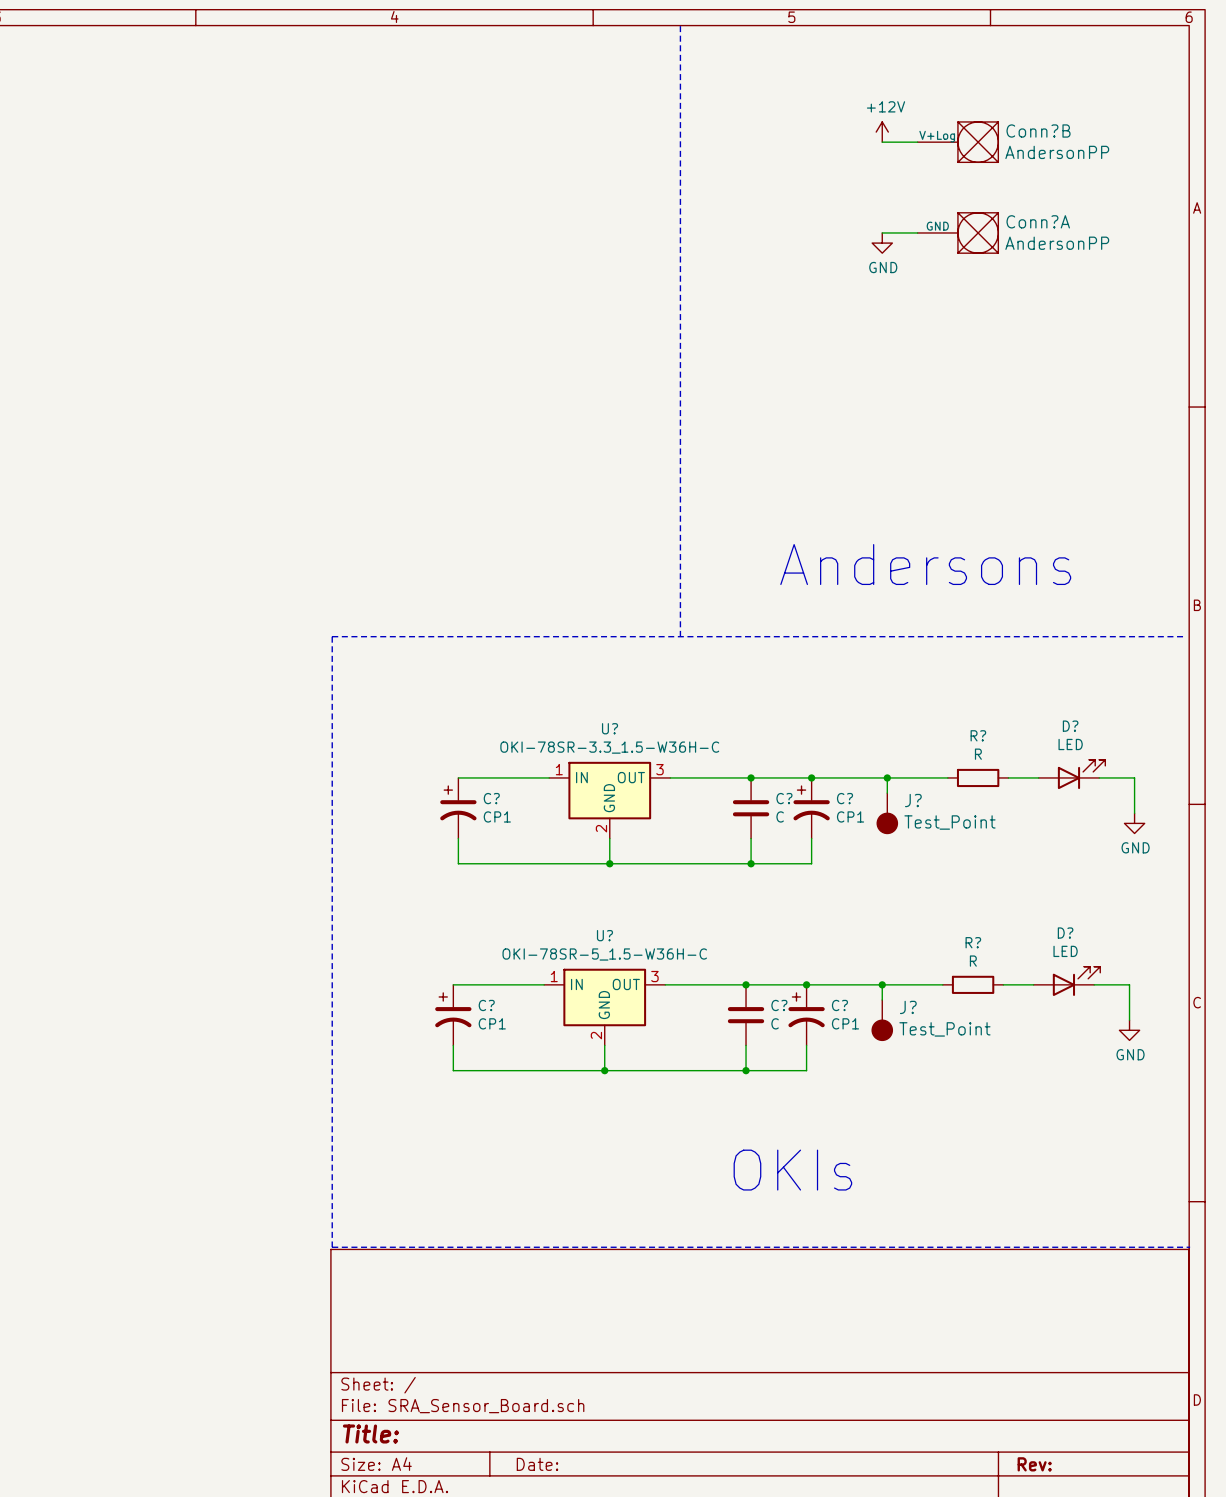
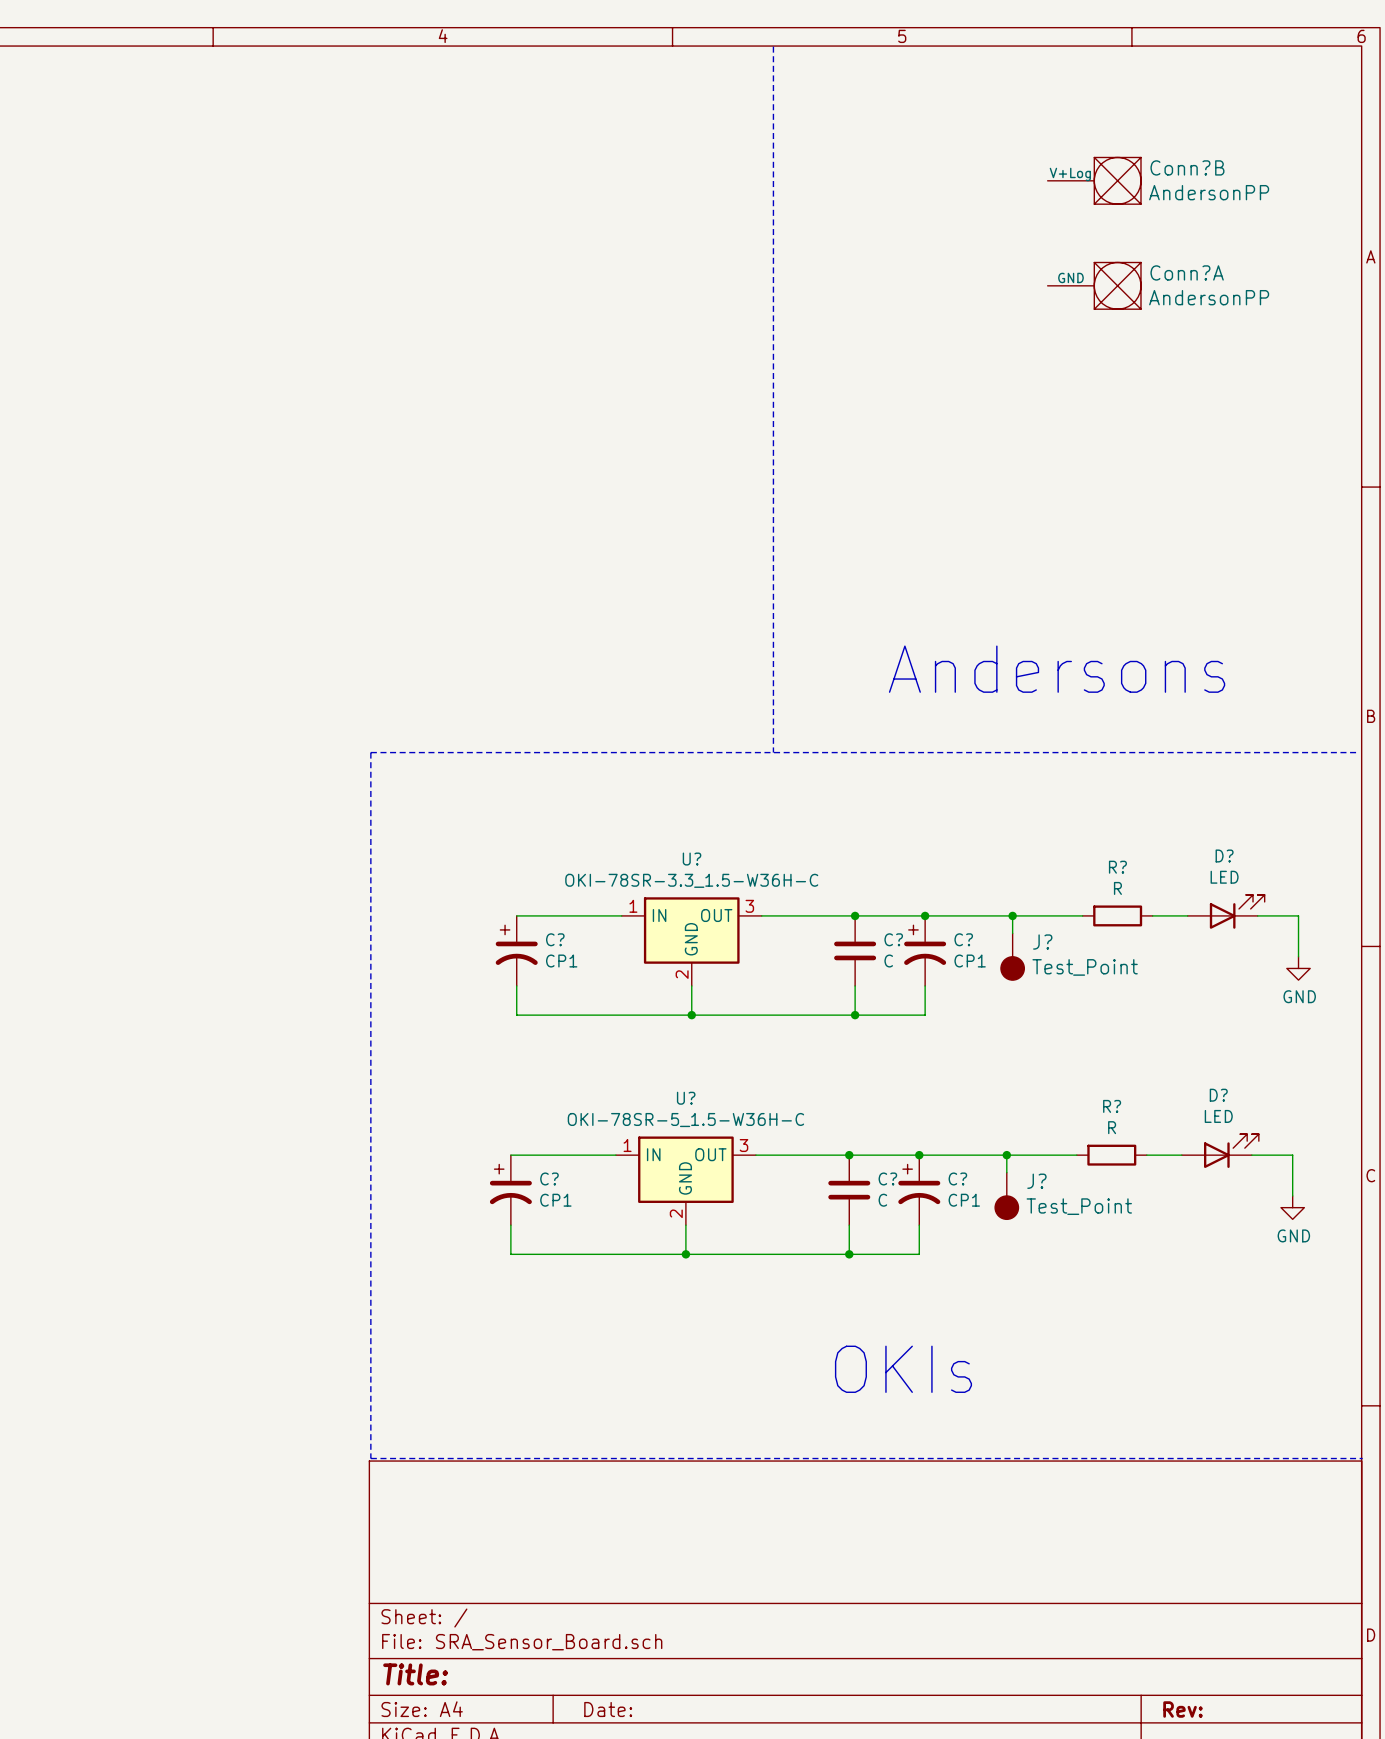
power symbol: +12V (882, 132) -> none
wire: (882, 142) (917, 142) -> none
wire: (882, 232) (917, 232) -> none
power symbol: GND (882, 243) -> none

